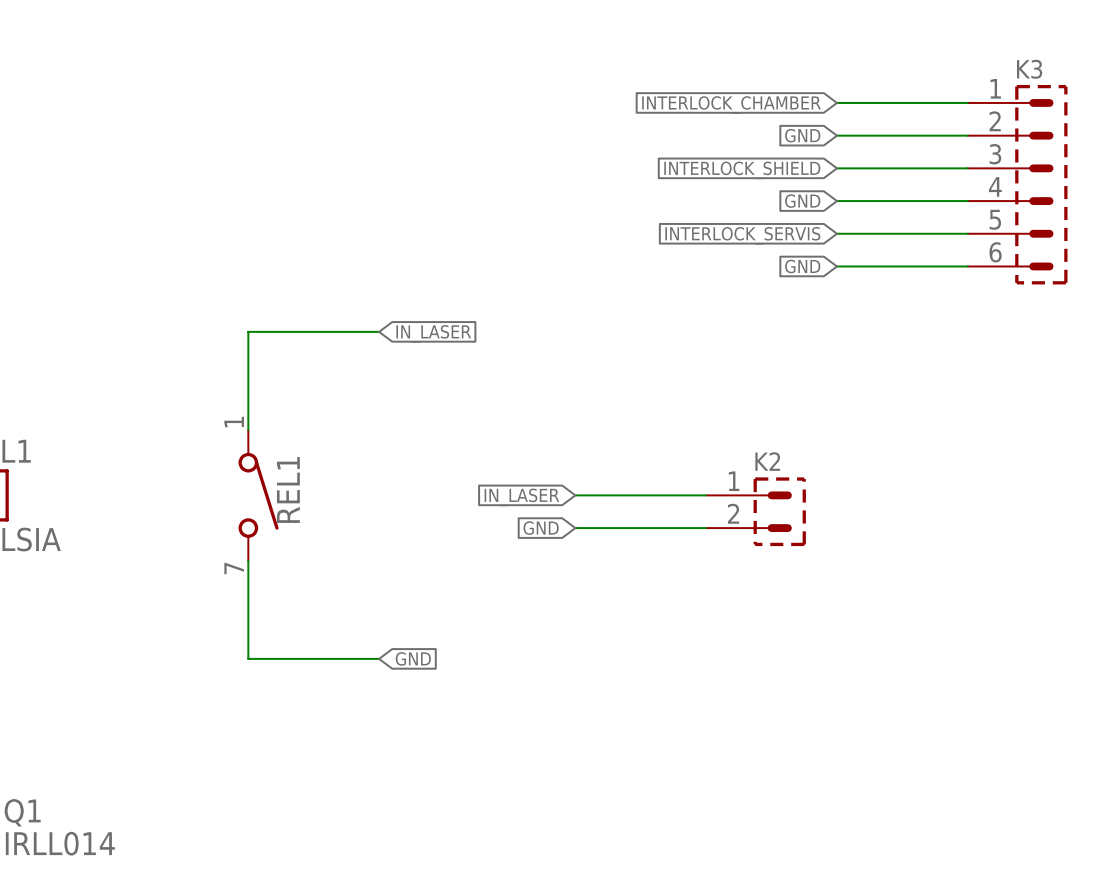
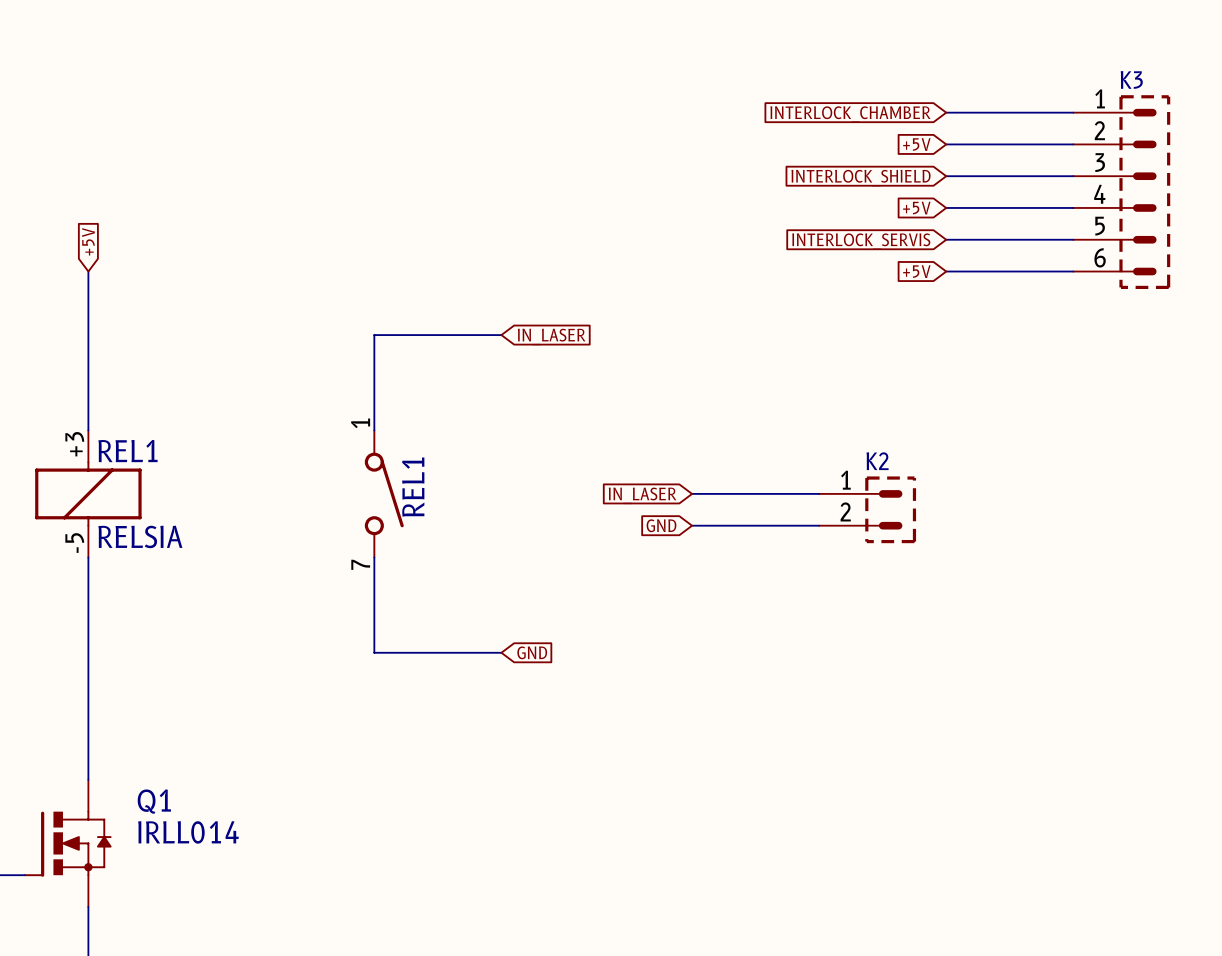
global label: GND (802, 135) -> +5V (916, 144)
global label: GND (802, 201) -> +5V (916, 208)
global label: GND (802, 266) -> +5V (916, 271)

